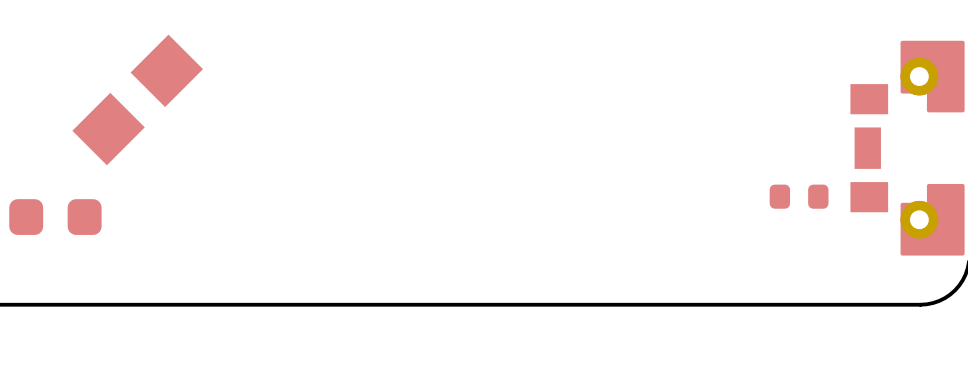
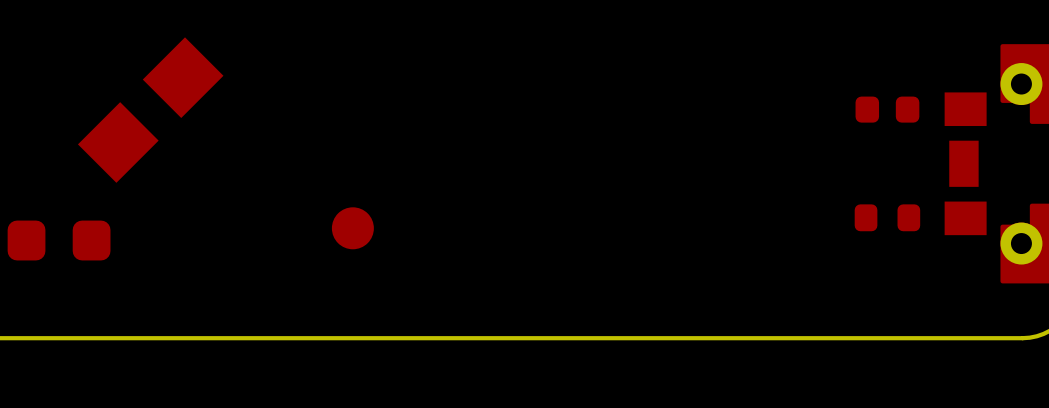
part: none -> (887, 109)
part: none -> (352, 228)

